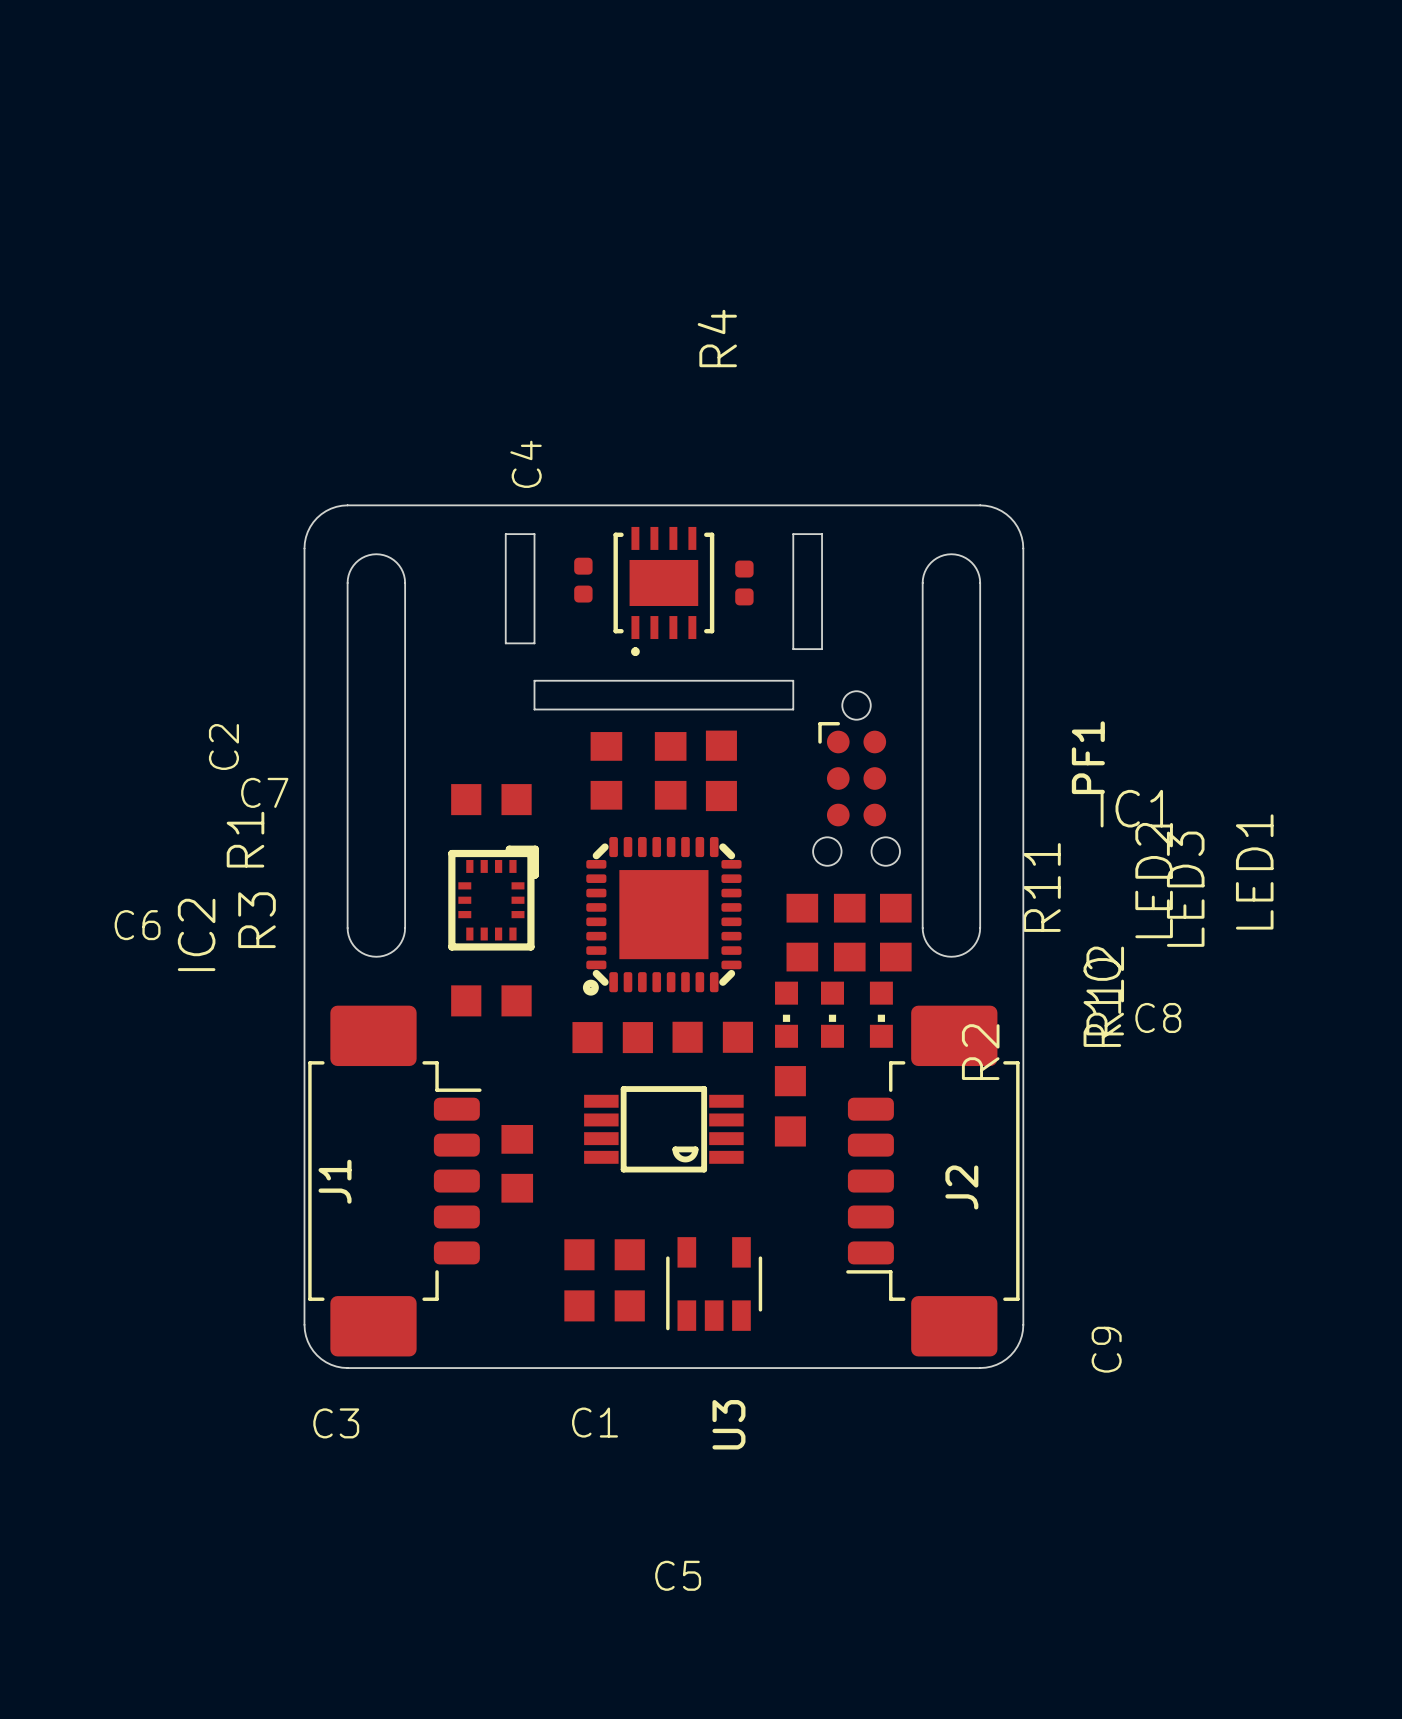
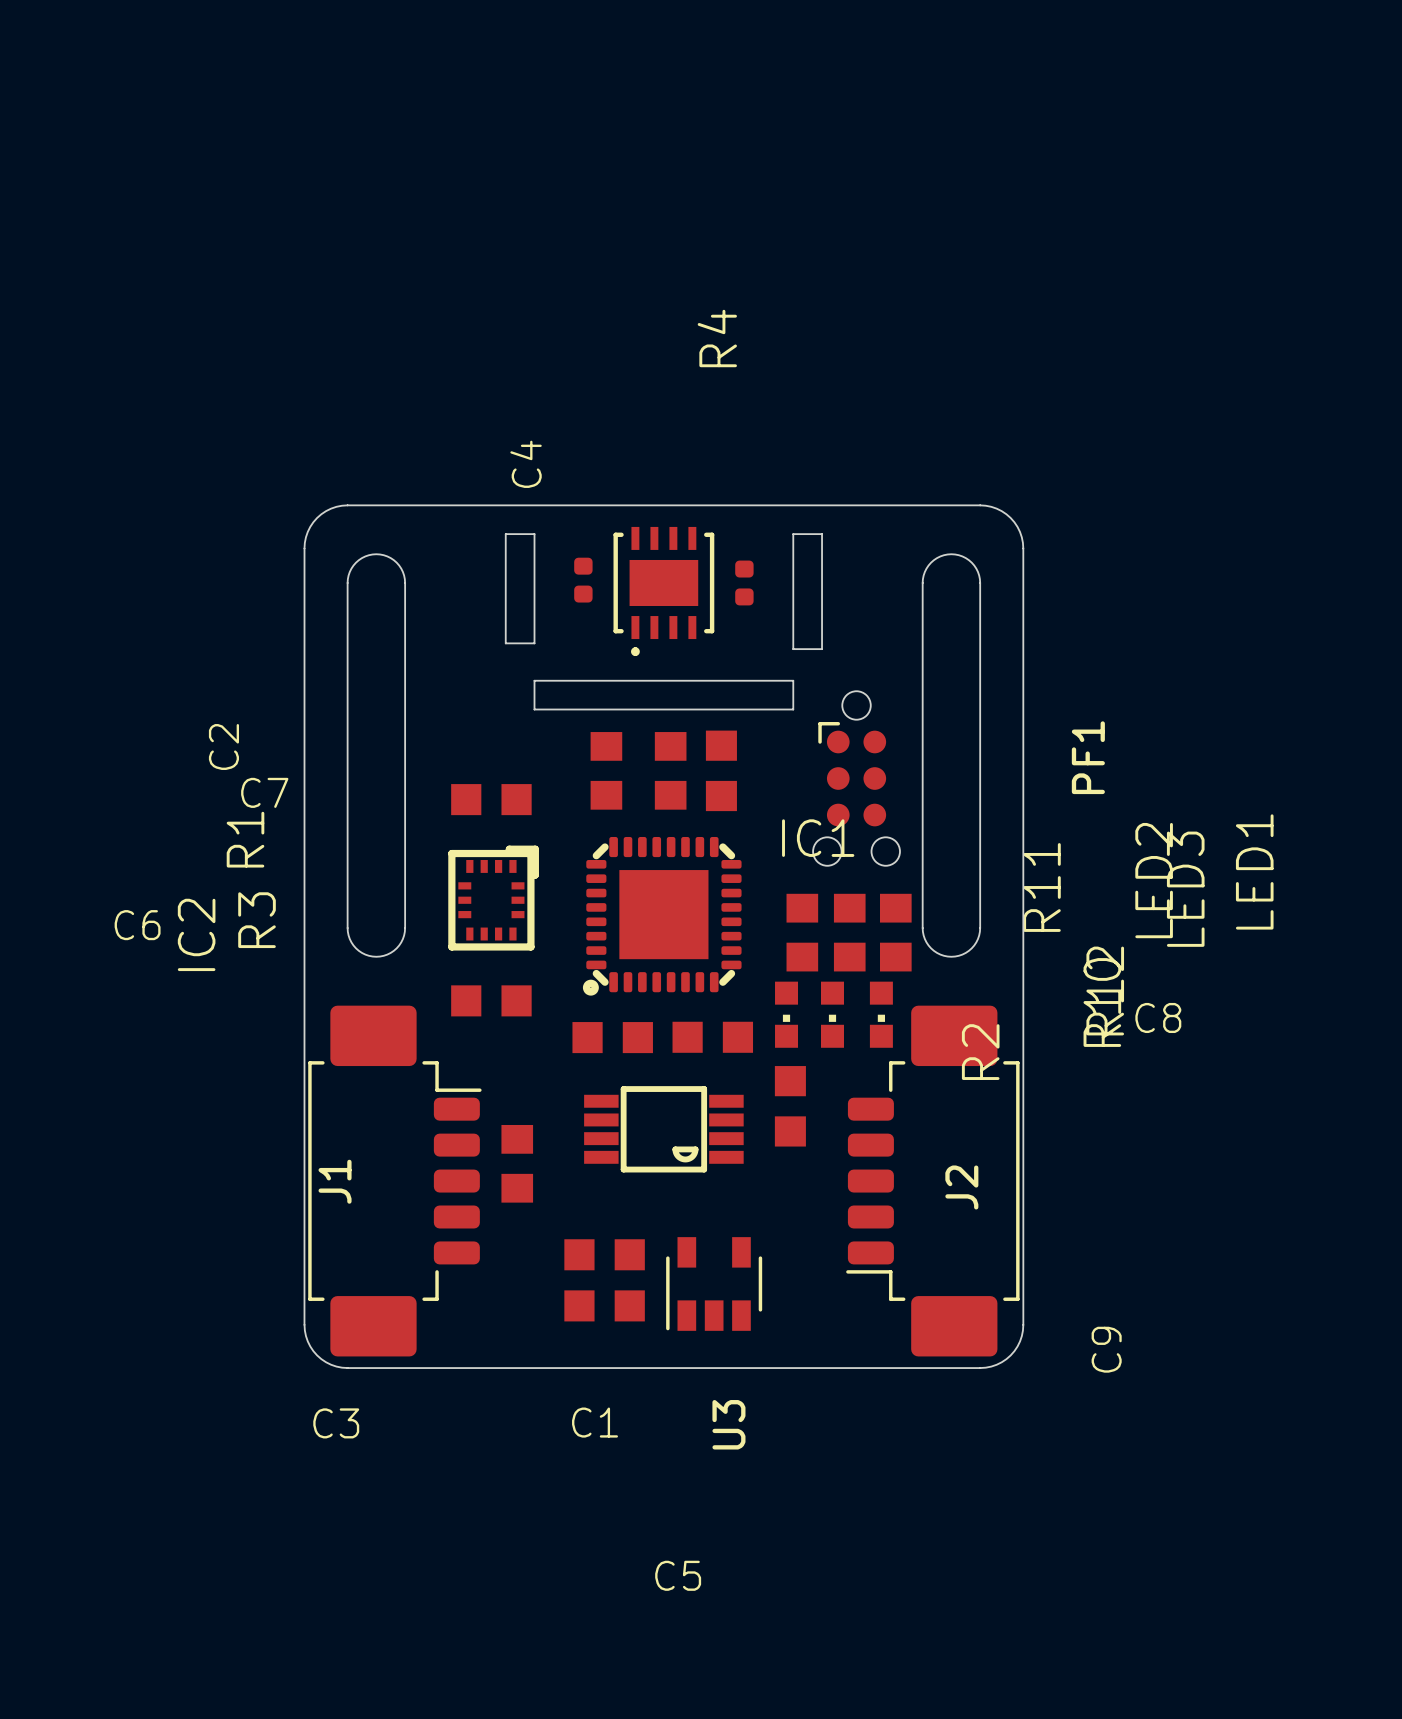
IC1 name position: IC1 (1136, 808) -> IC1 (818, 838)

